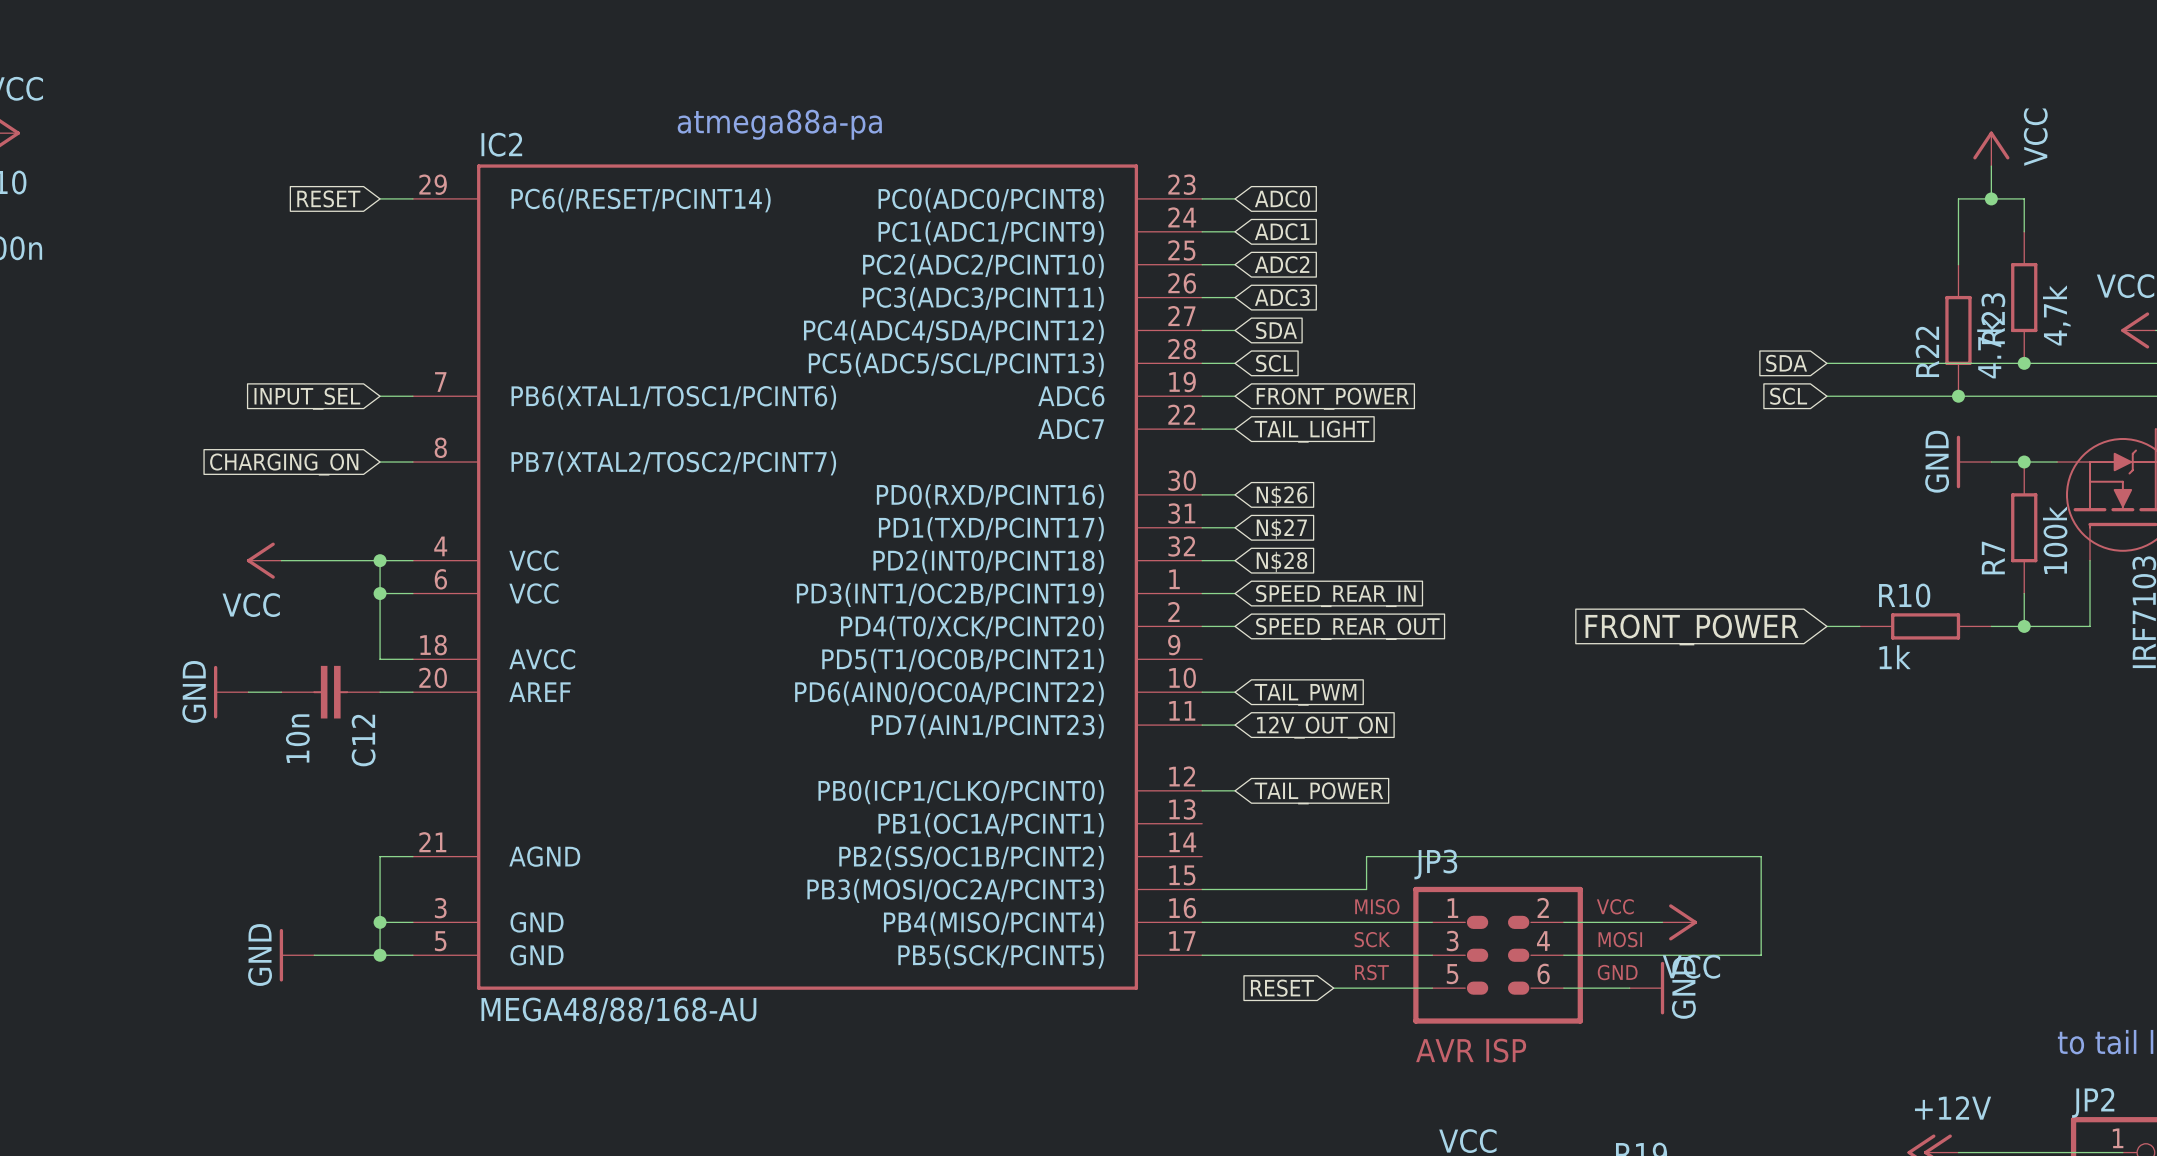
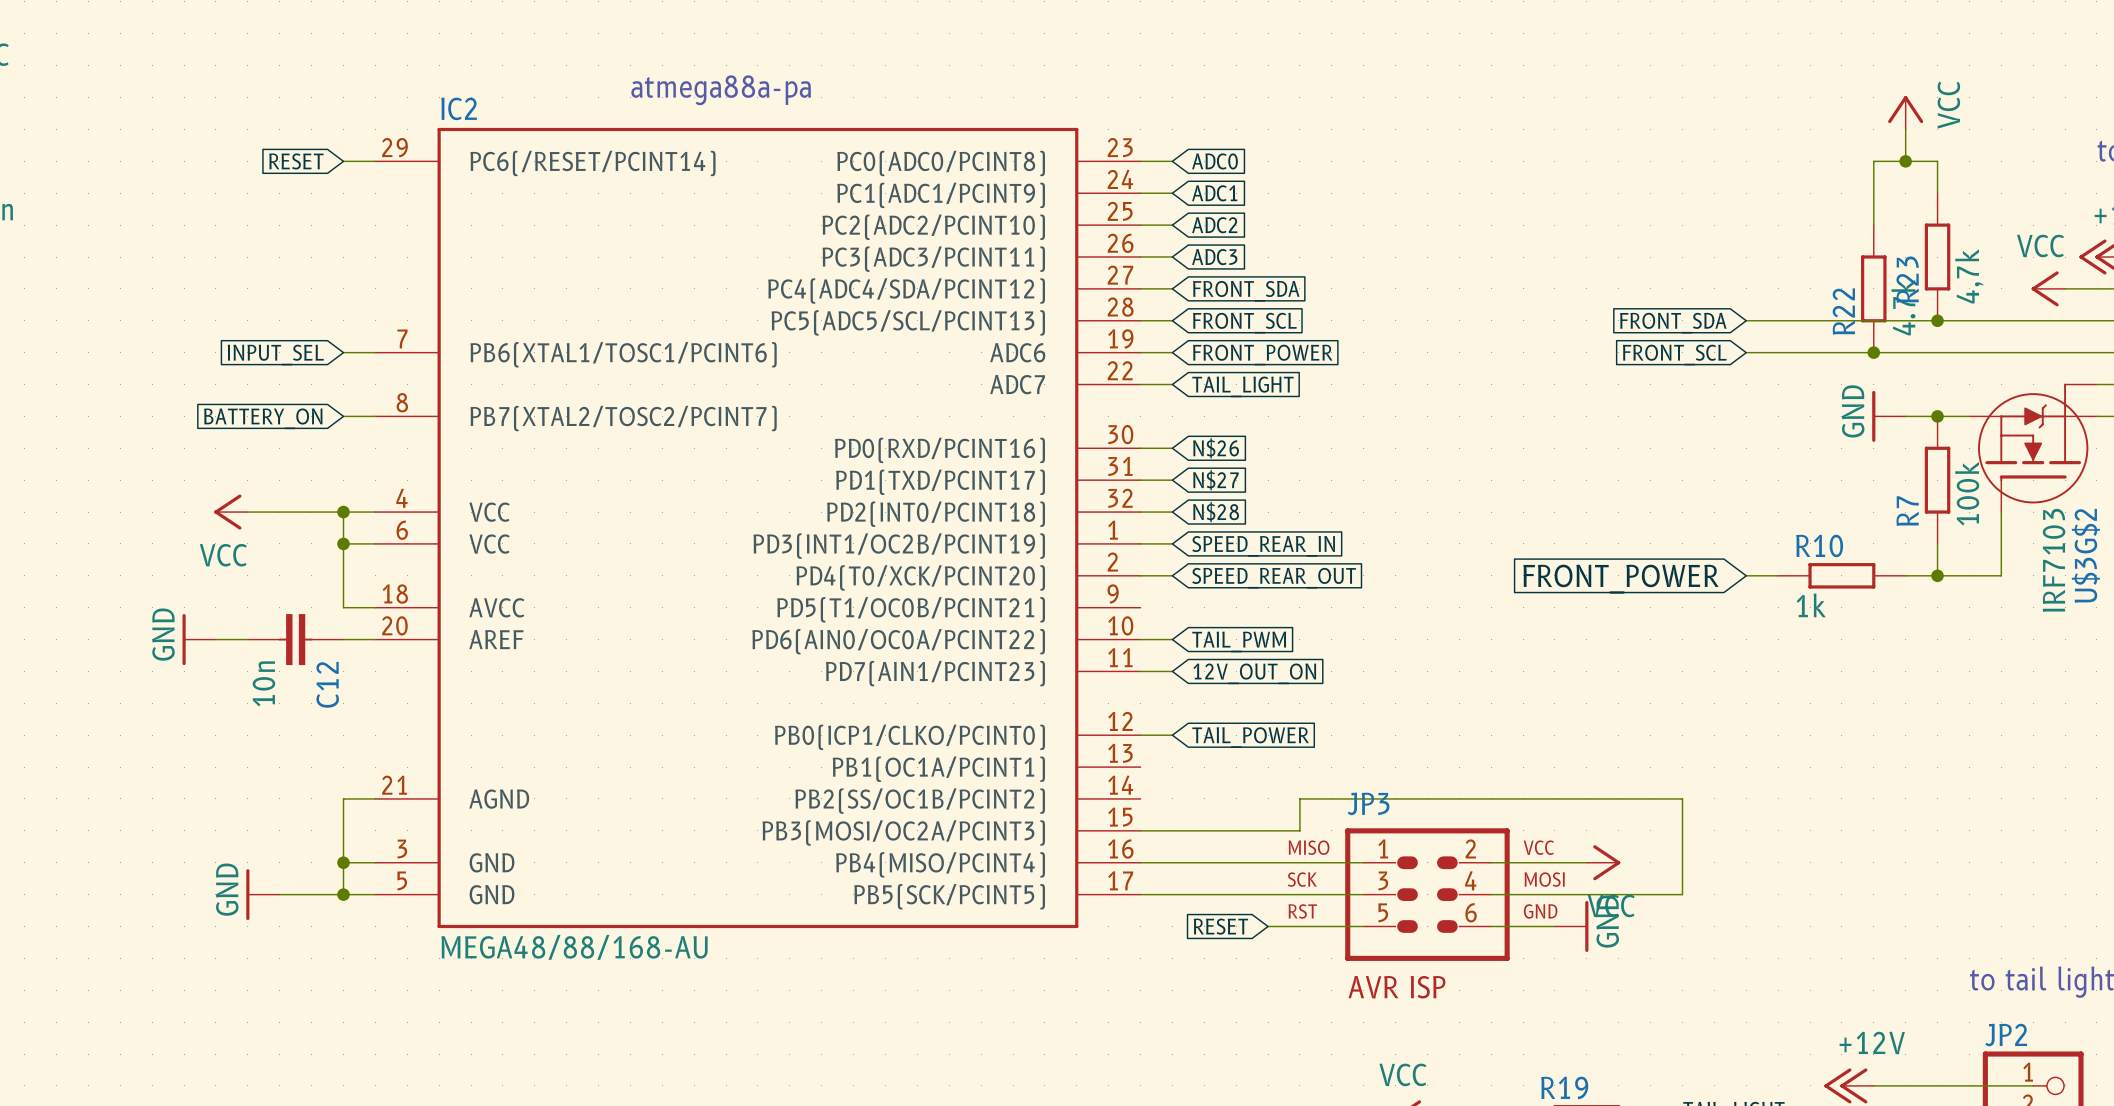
global label: SDA (1276, 330) -> FRONT_SDA (1246, 291)
global label: SCL (1274, 363) -> FRONT_SCL (1244, 323)
global label: SDA (1786, 363) -> FRONT_SDA (1673, 323)
global label: SCL (1788, 396) -> FRONT_SCL (1674, 355)
global label: CHARGING_ON (284, 464) -> BATTERY_ON (263, 418)

